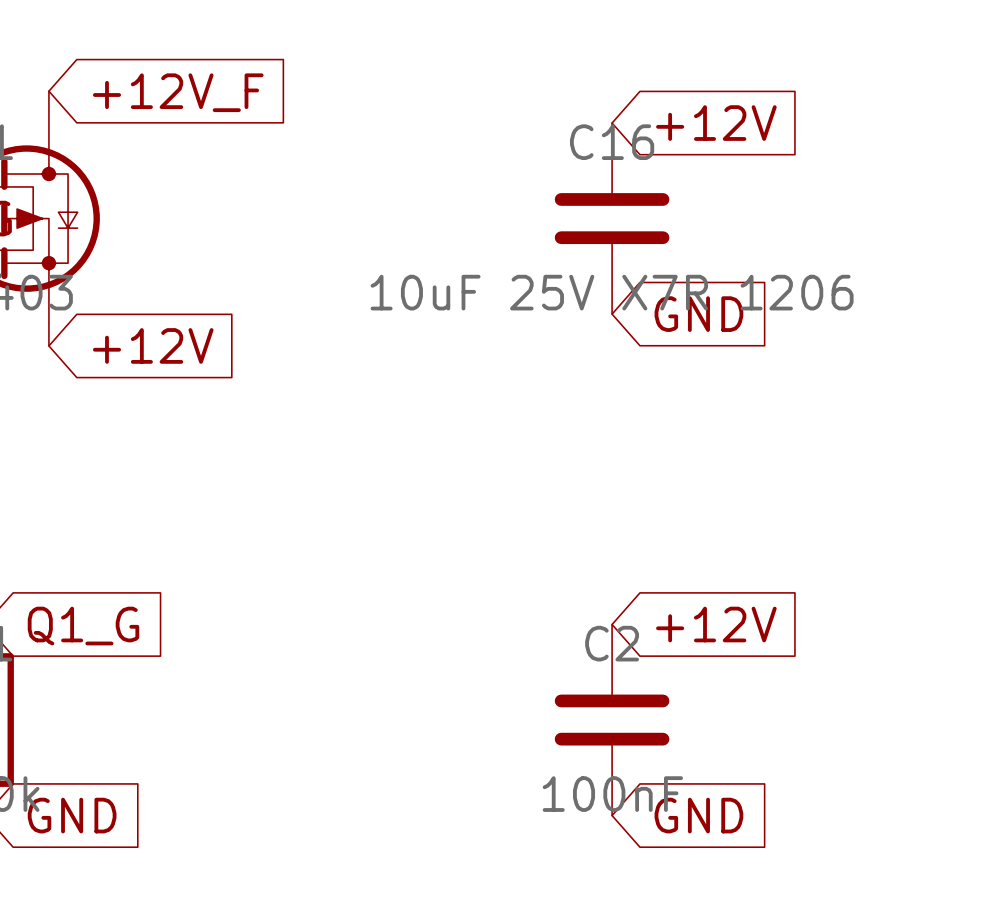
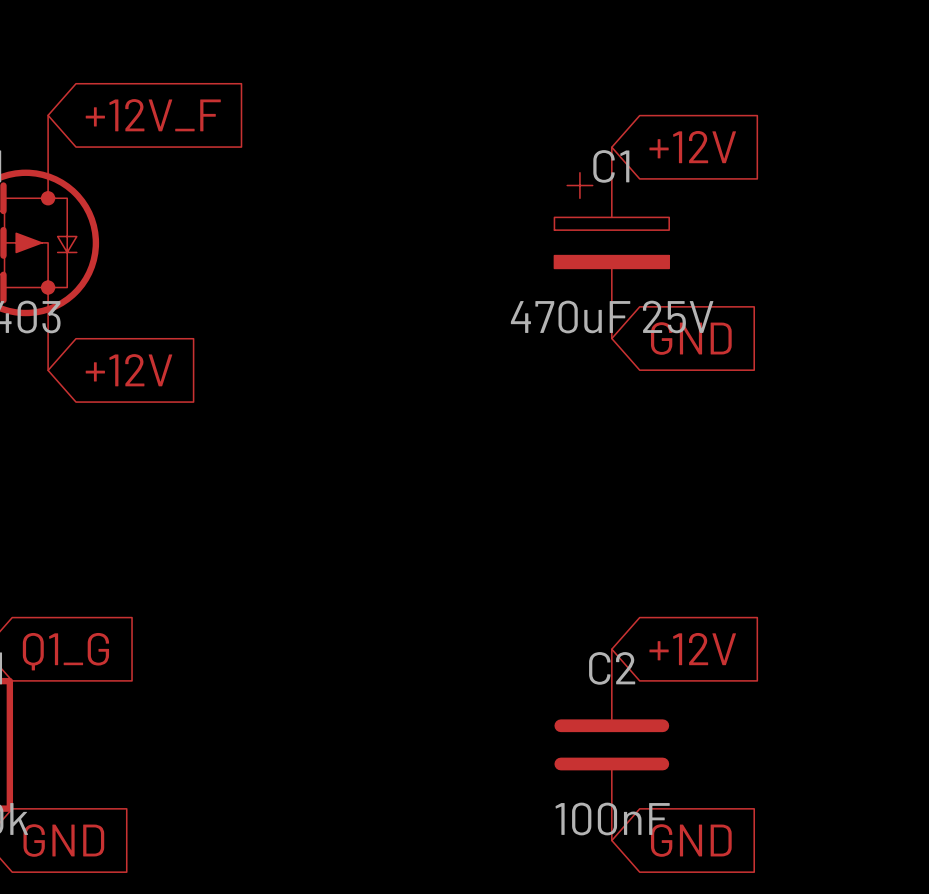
C16: 10uF 25V X7R 1206 (612, 218) -> none
C1: none -> 470uF 25V (611, 242)

